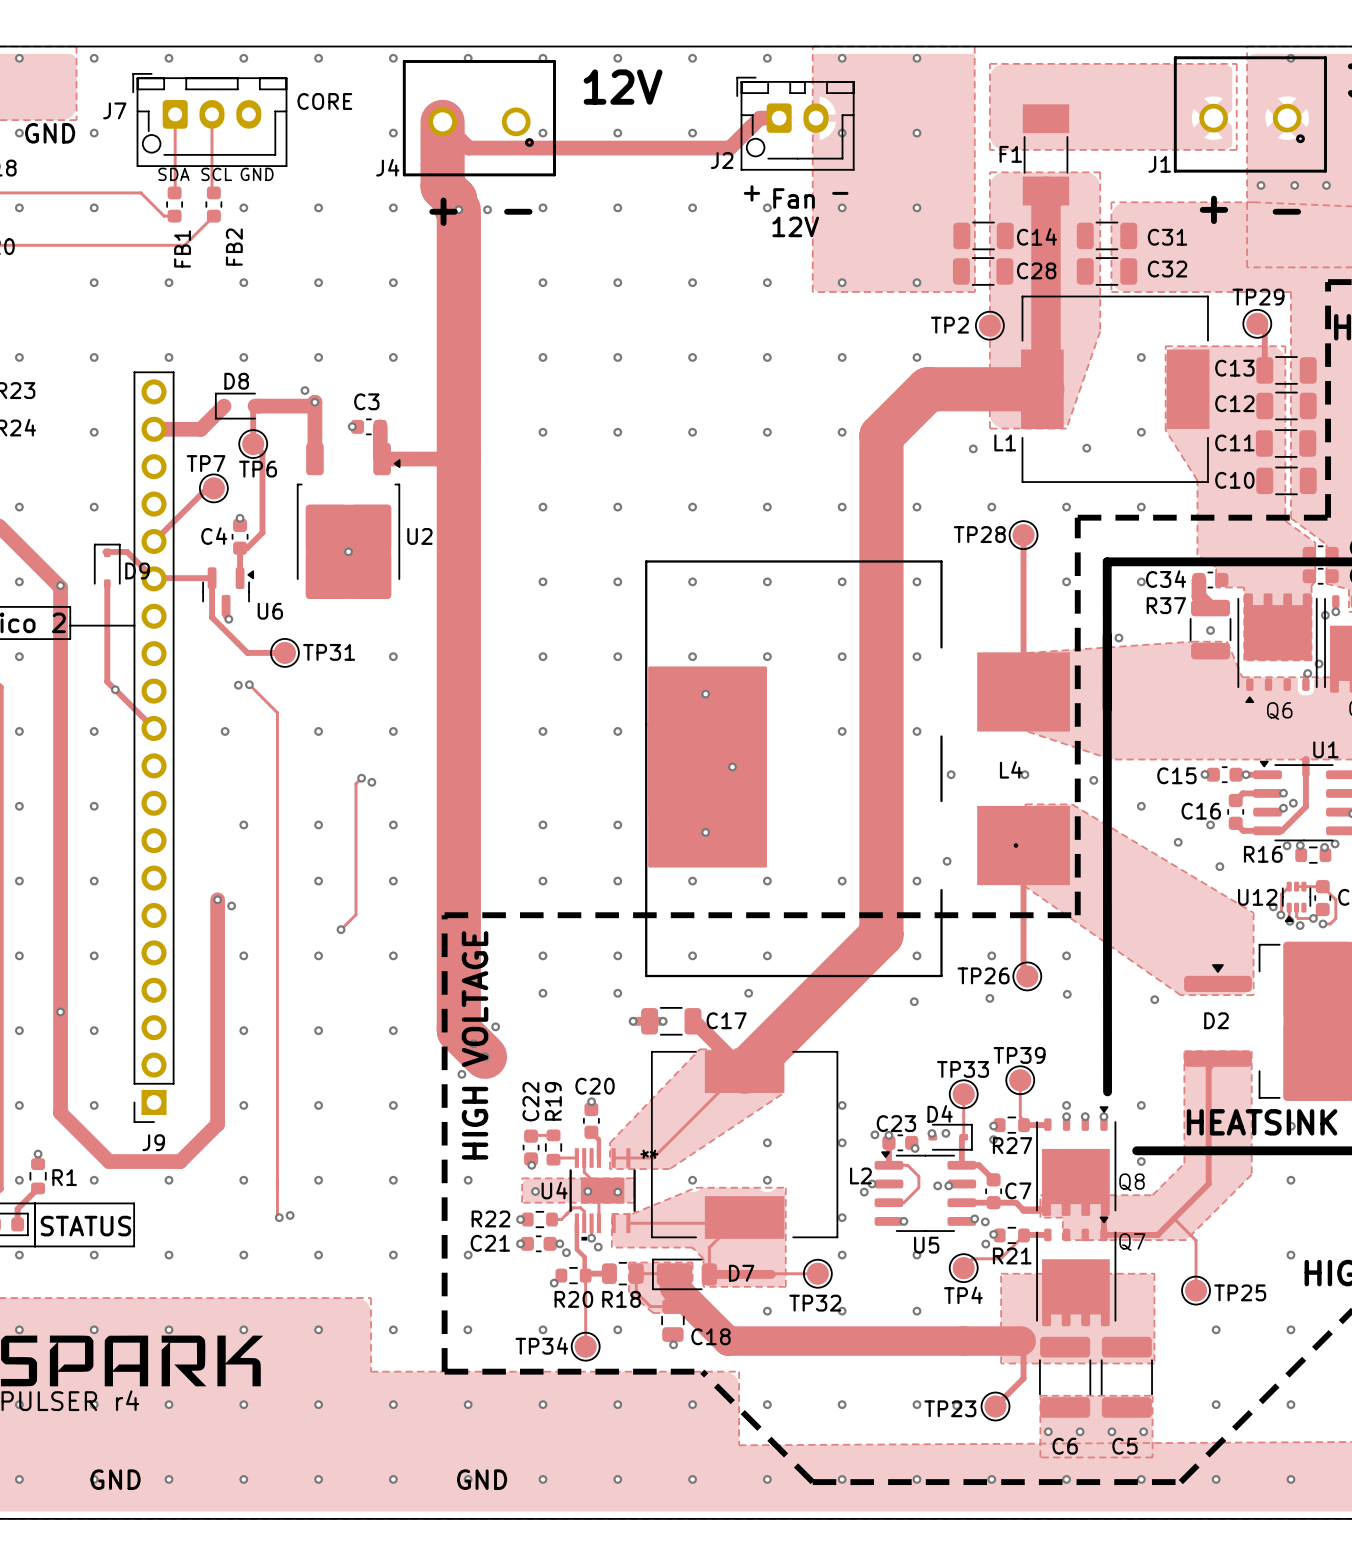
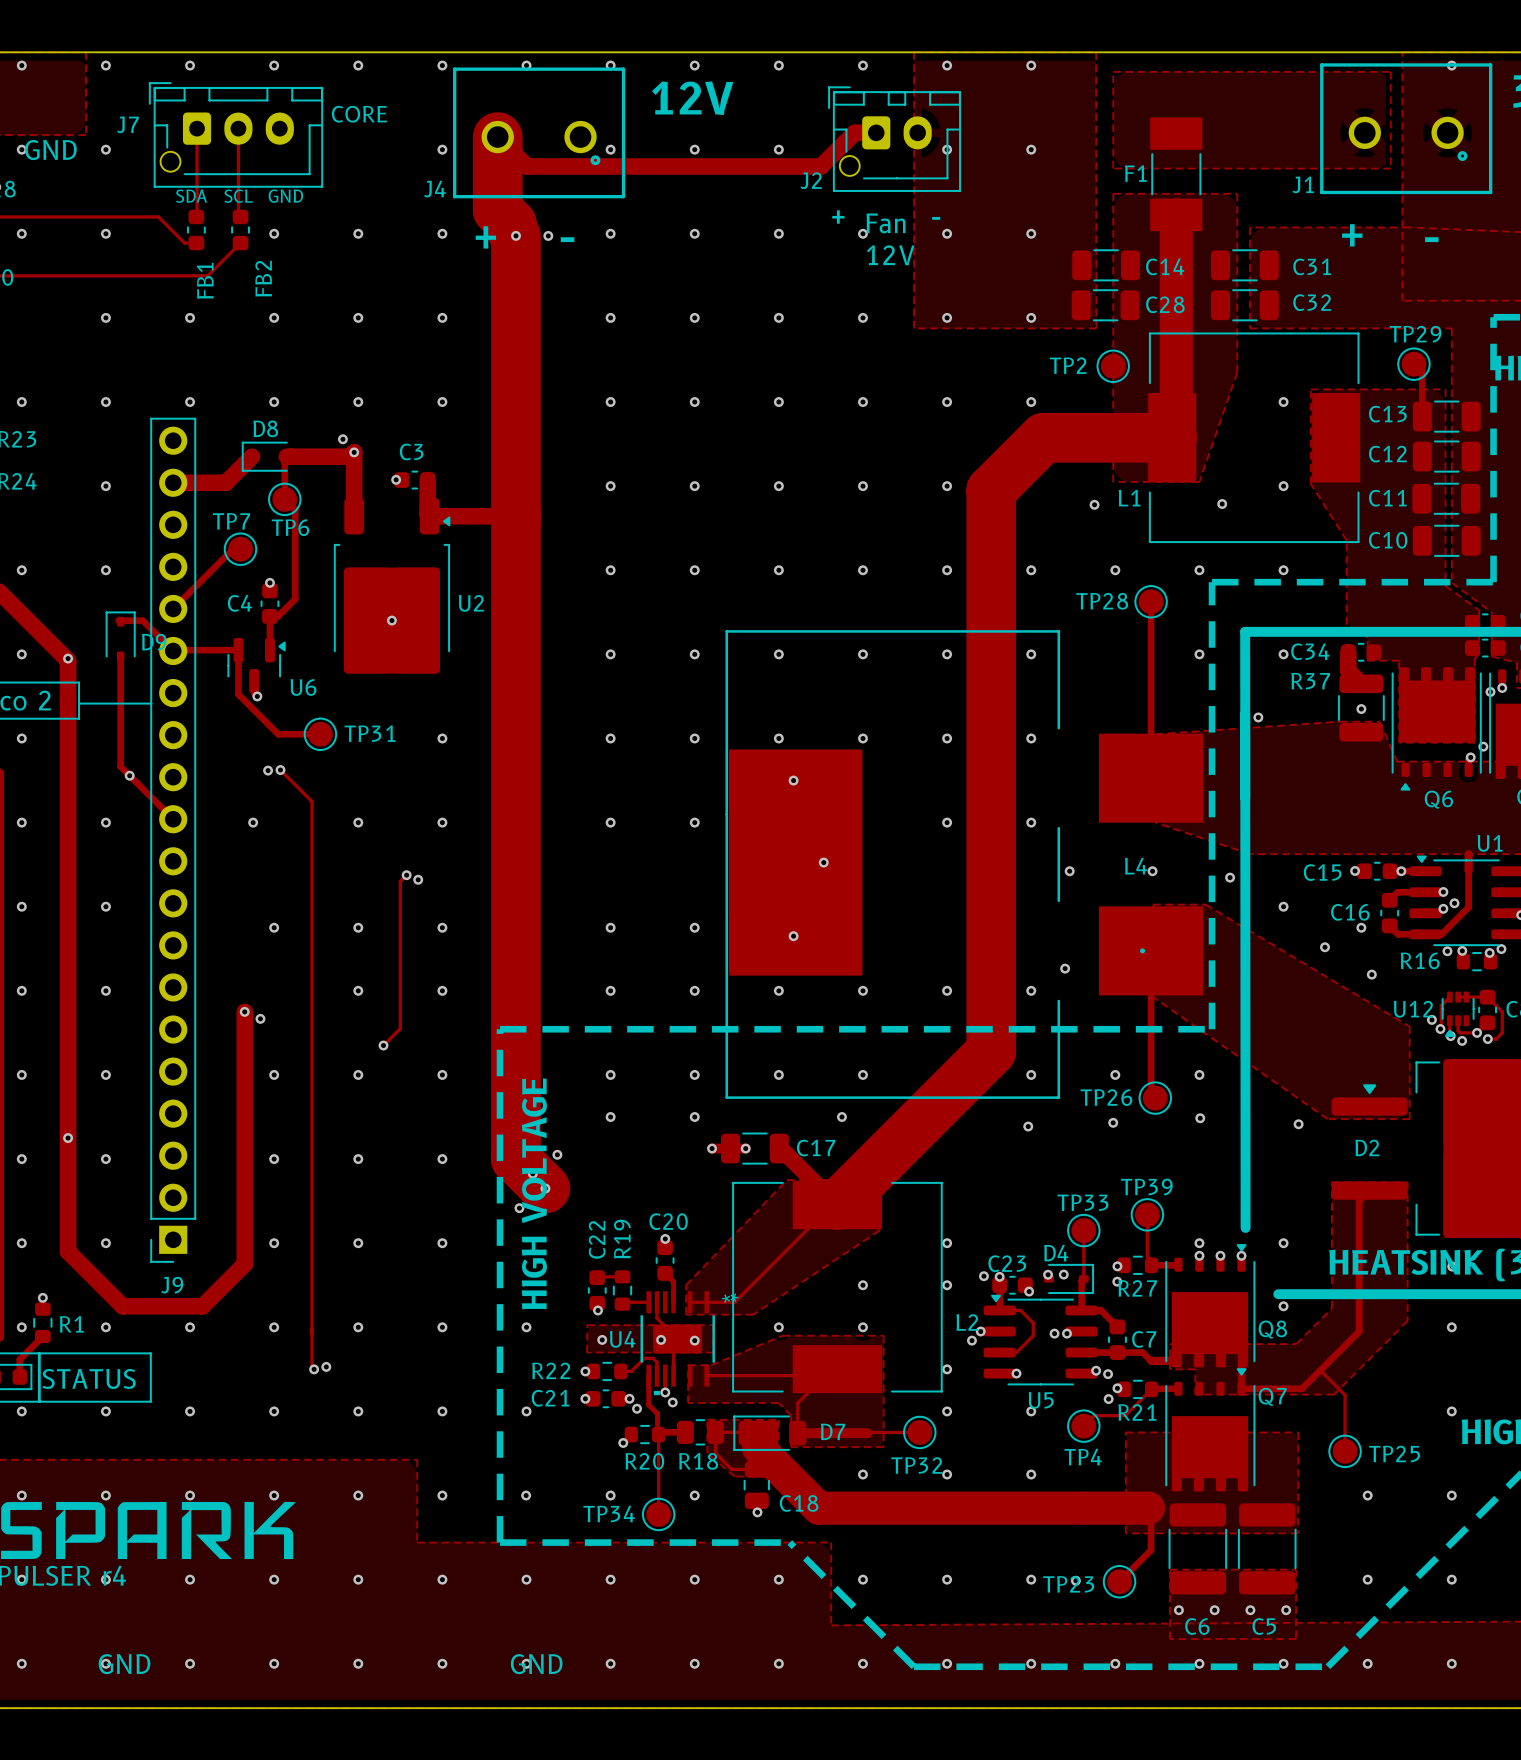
via: (1261, 185) -> none
via: (1294, 185) -> none
via: (1326, 185) -> none

